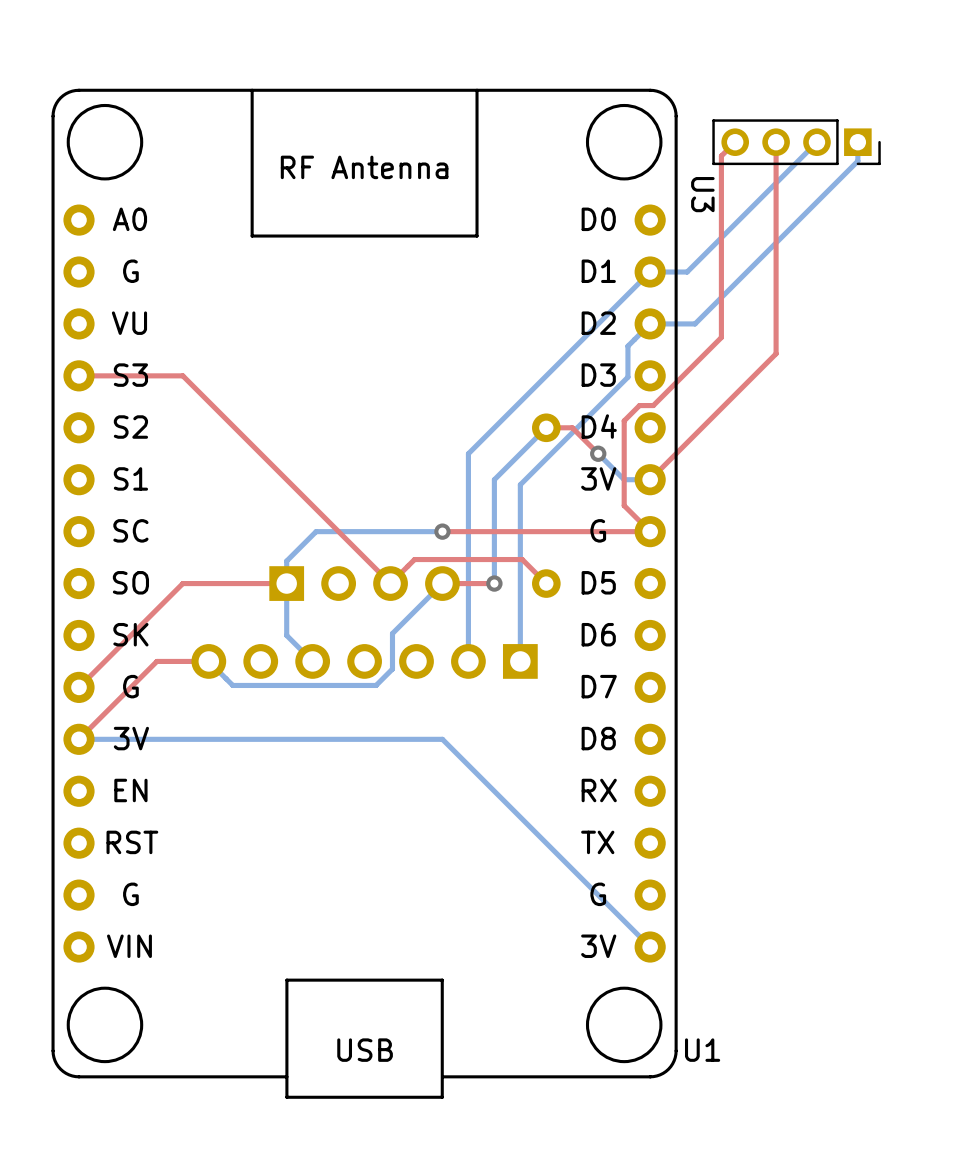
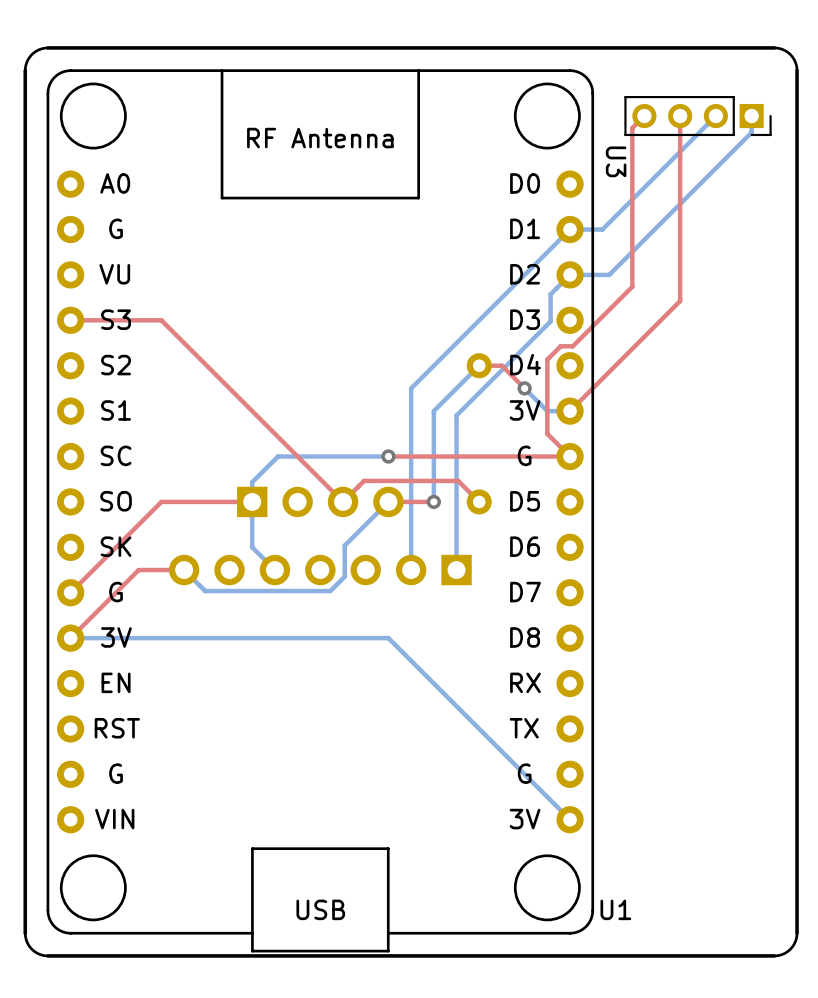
board edge: none -> (47, 47) (774, 47) (785, 50) (792, 56) (797, 70) (797, 933) (795, 941) (788, 951) (774, 955) (47, 955) (36, 952) (29, 947) (25, 933) (25, 70) (26, 61) (31, 54) (39, 49) (47, 47)

